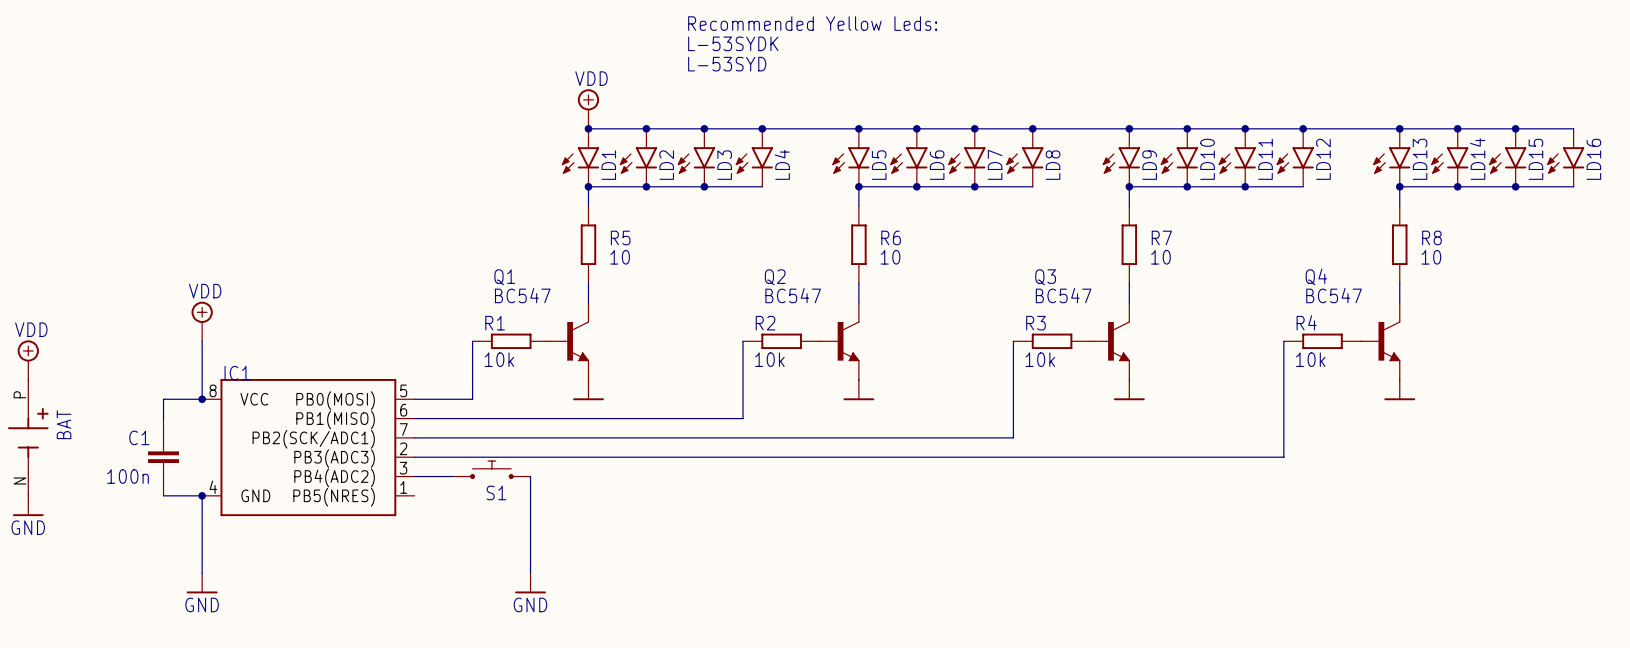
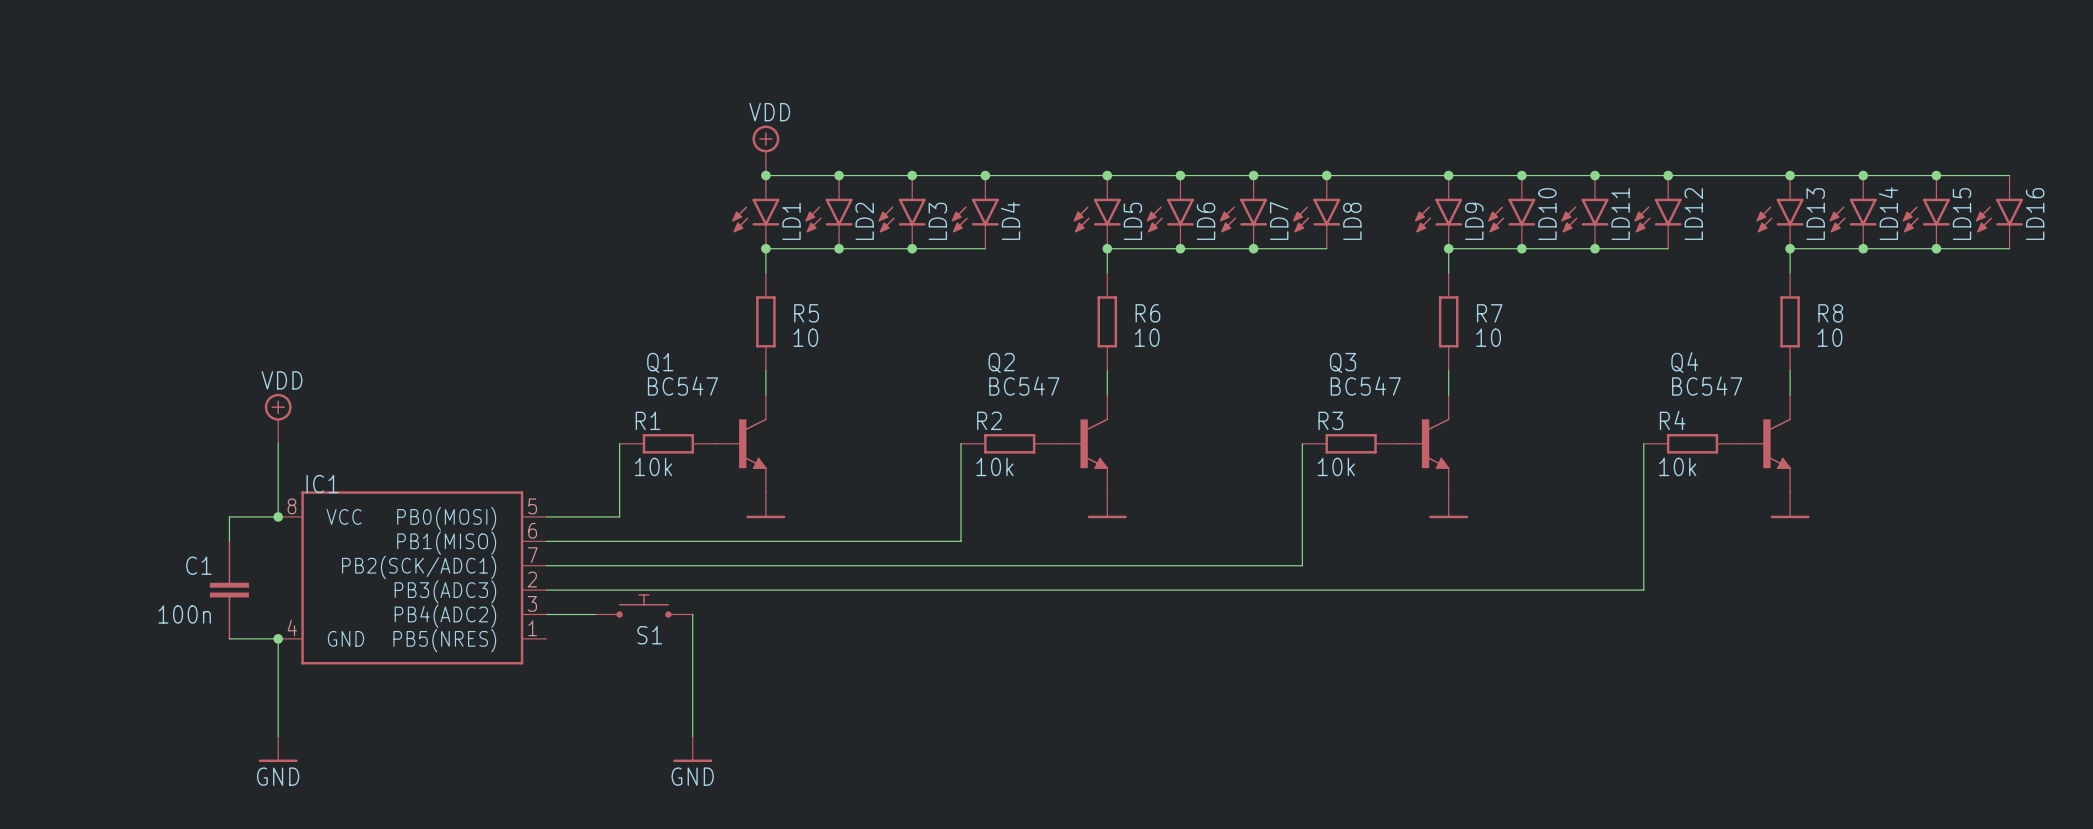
text: Recommended Yellow Leds: (812, 23) -> none
text: L-53SYDK (733, 43) -> none
text: L-53SYD (727, 64) -> none
power symbol: VDD (28, 360) -> none
BAT: (28, 437) -> none
power symbol: GND (28, 505) -> none

